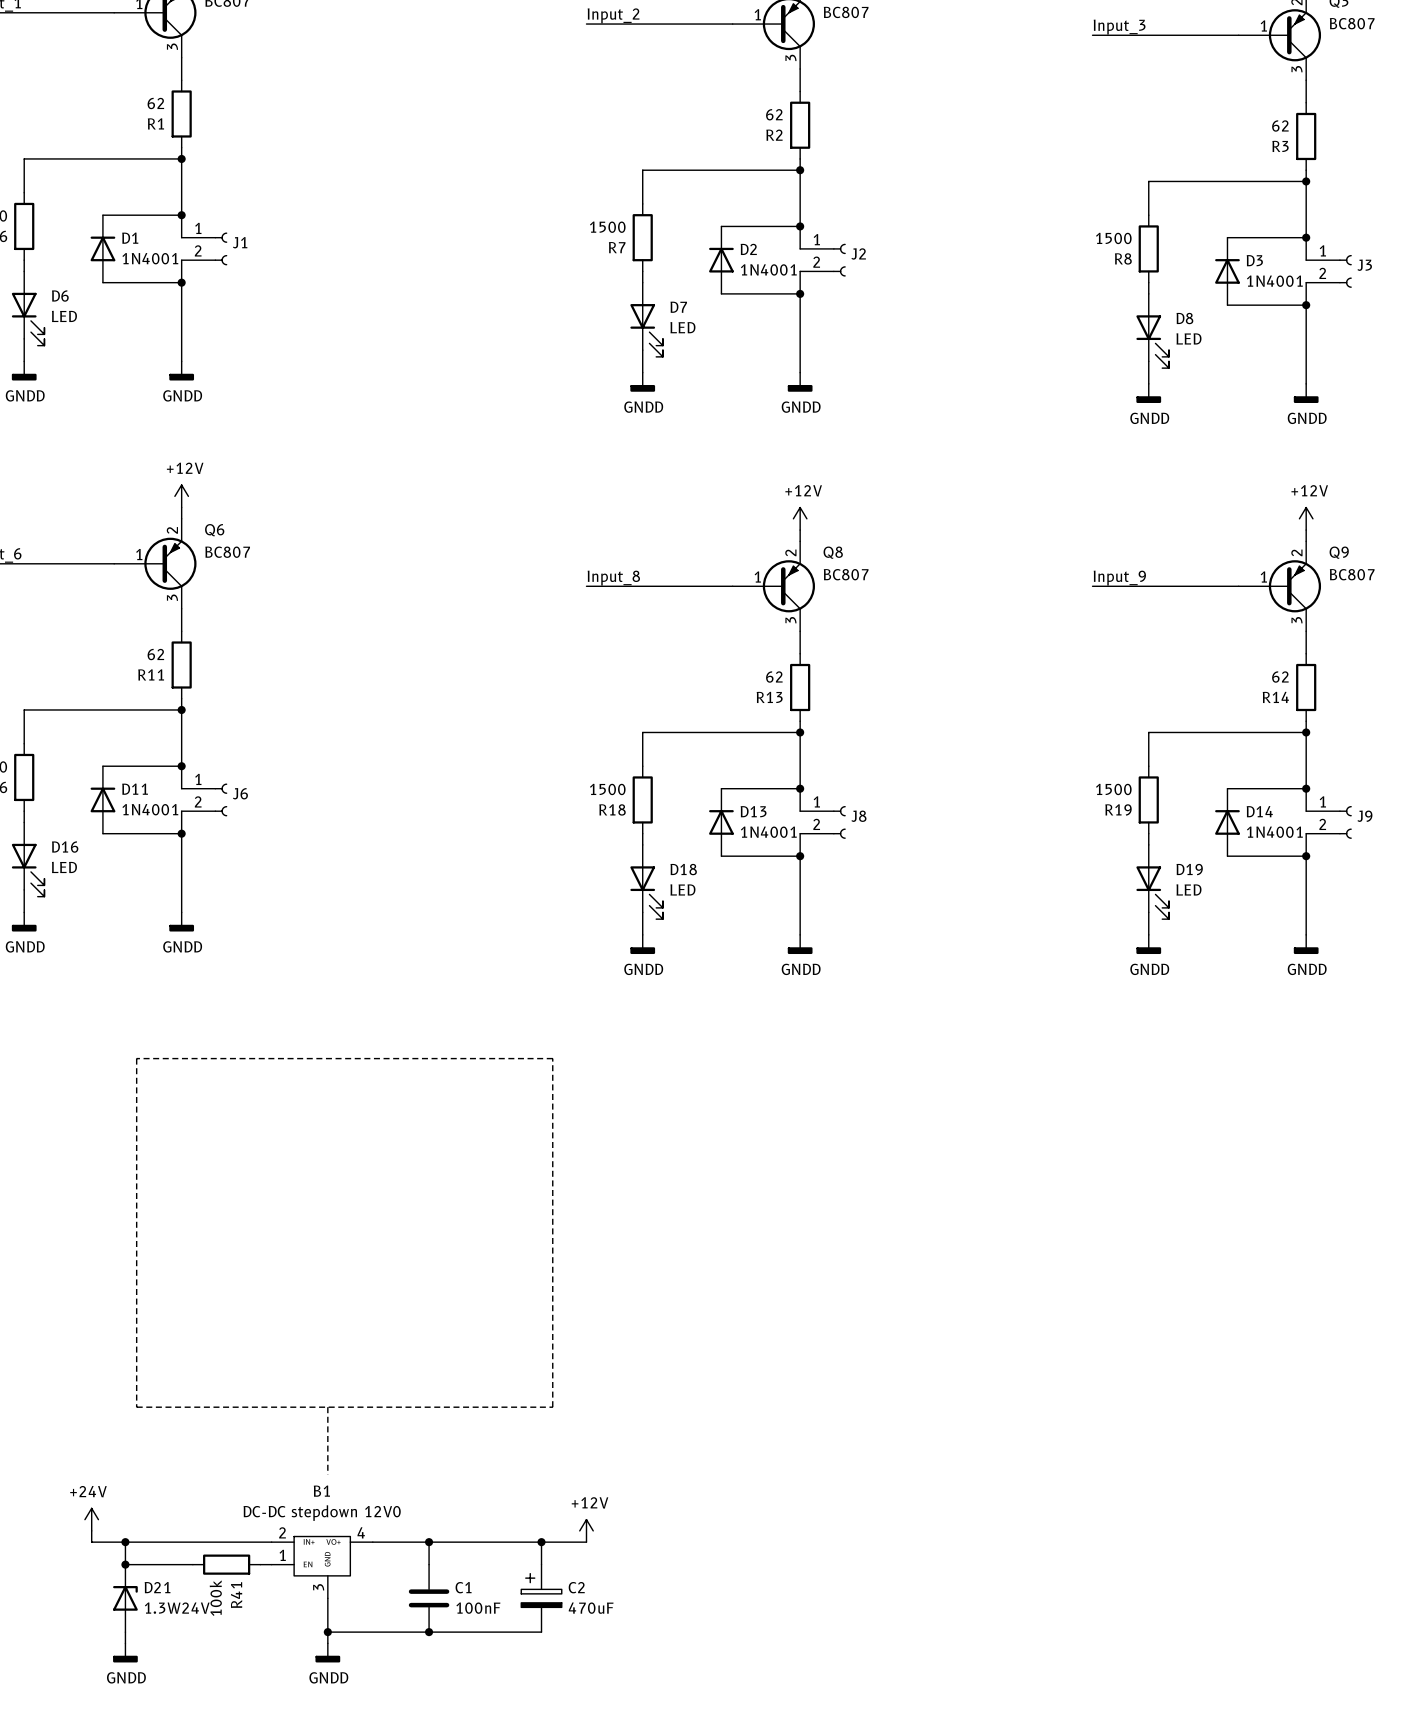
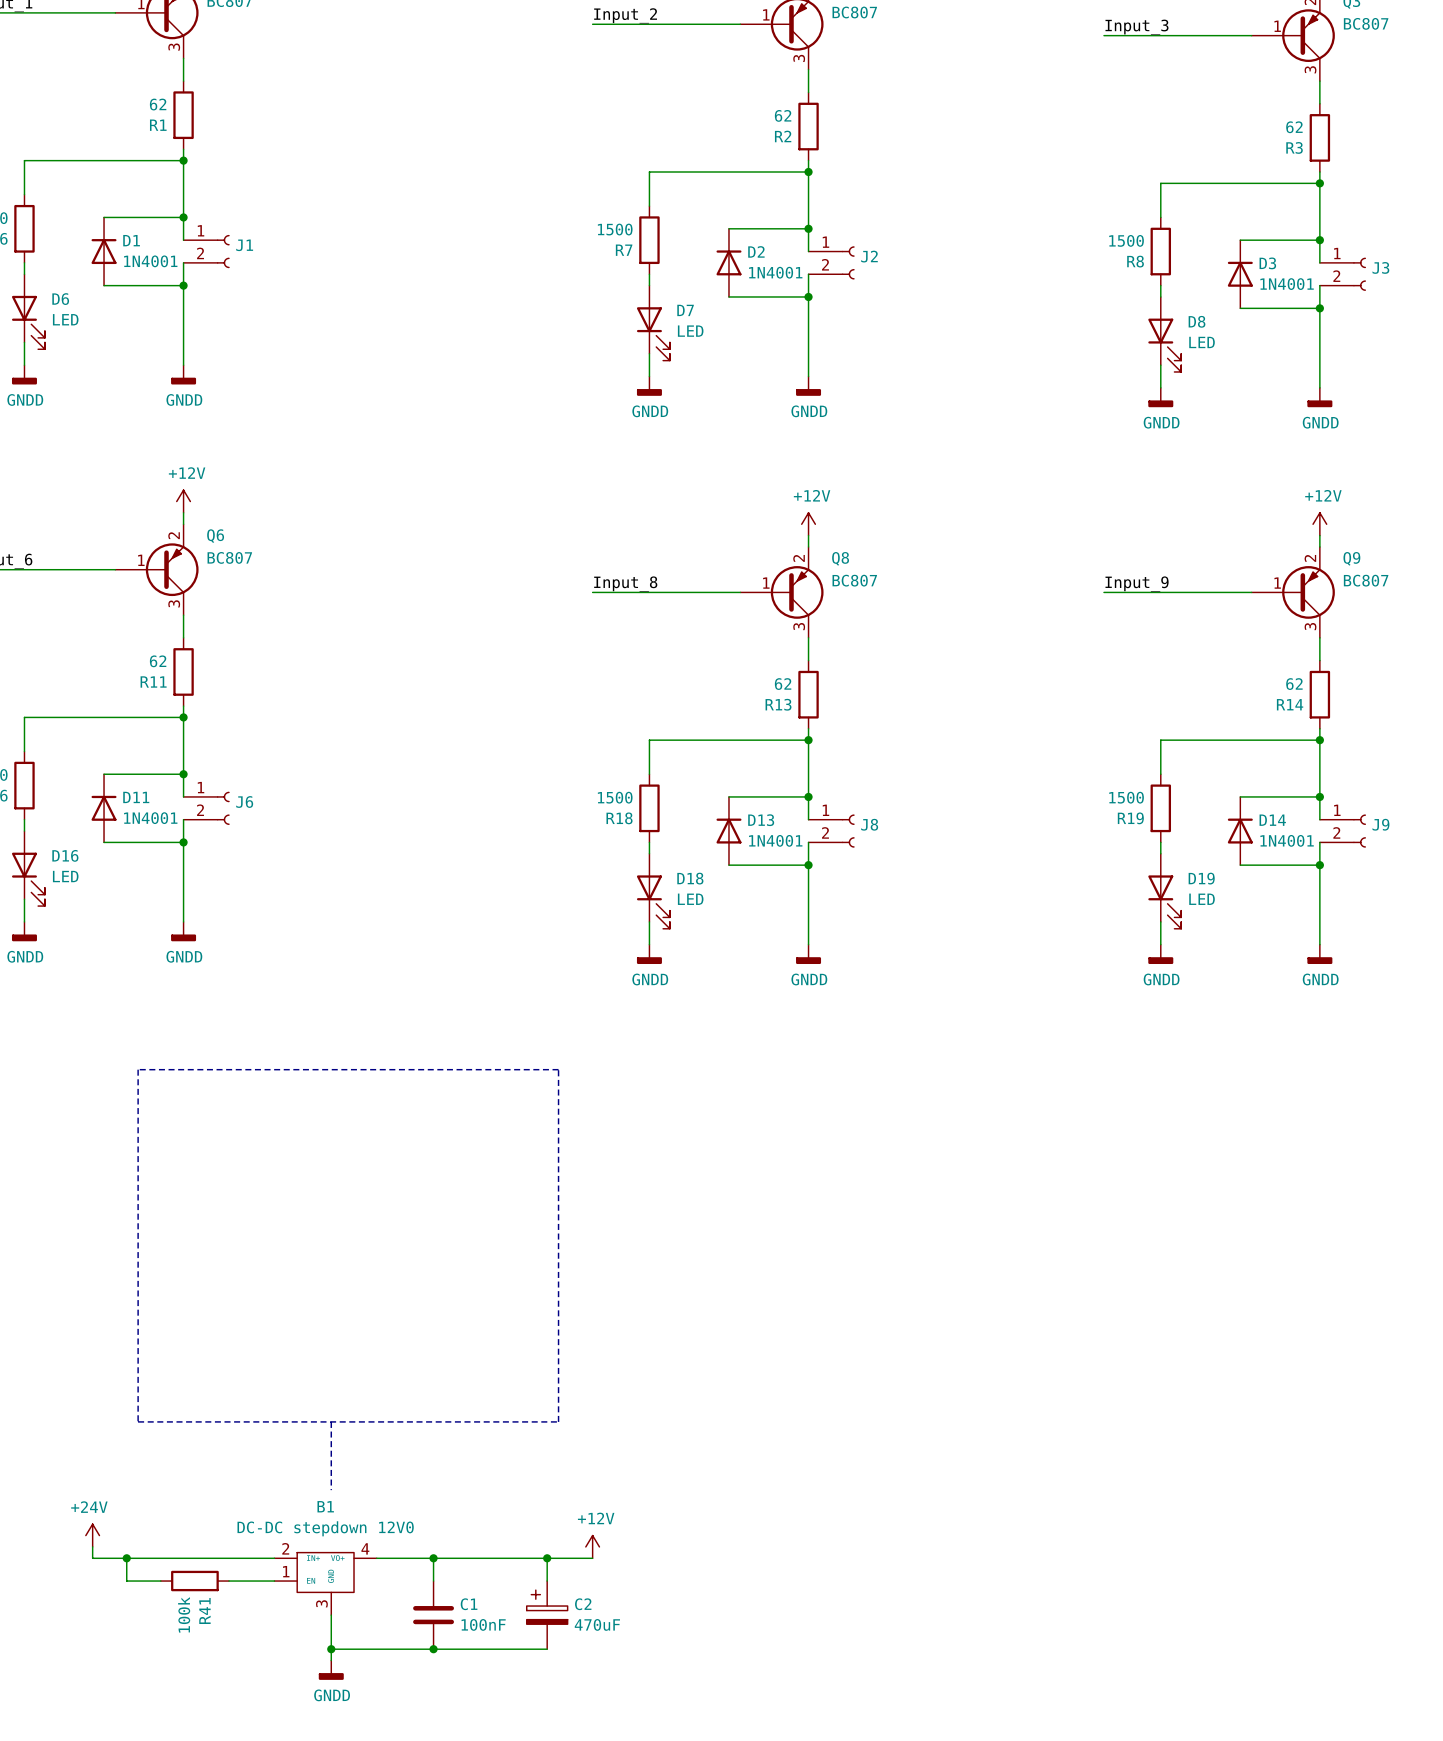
junction: (125, 1564) -> none
wire: (159, 1564) (192, 1564) -> (229, 1581) (263, 1581)
R41 position: (226, 1564) -> (194, 1581)
D21: 1.3W24V (125, 1598) -> none
wire: (125, 1632) (125, 1643) -> none
power symbol: GNDD (125, 1652) -> none

